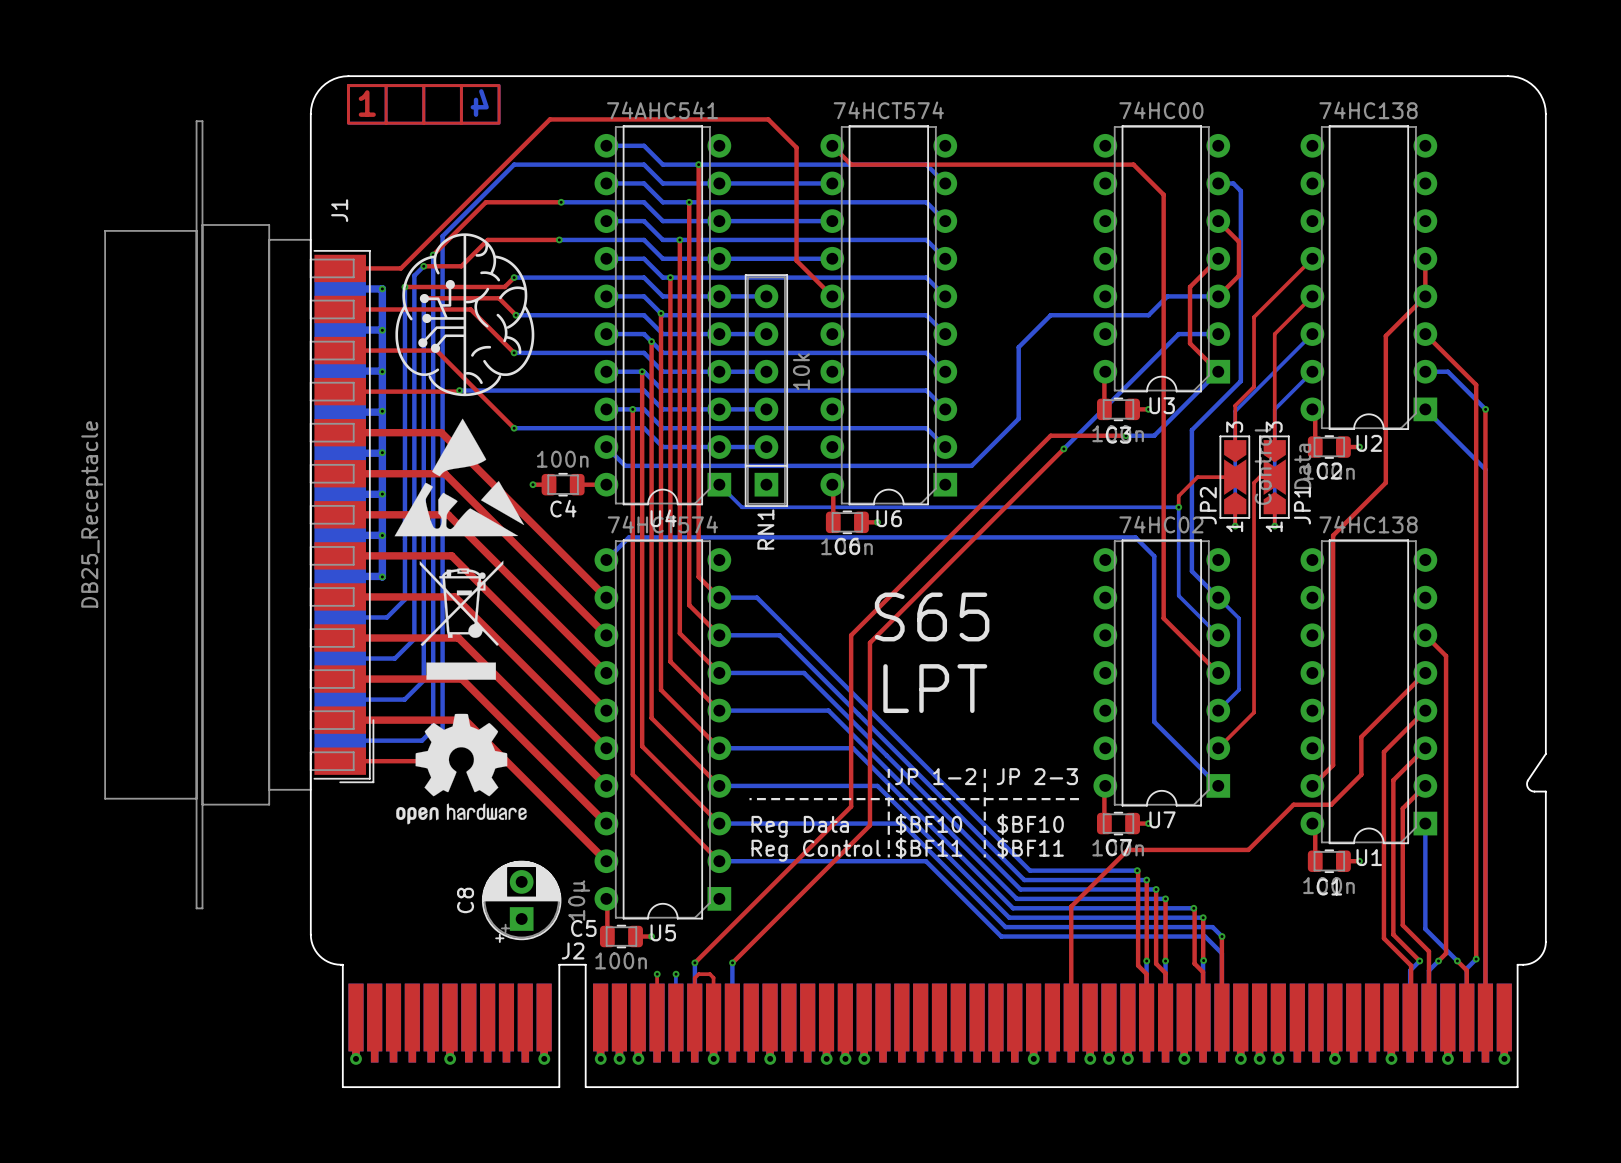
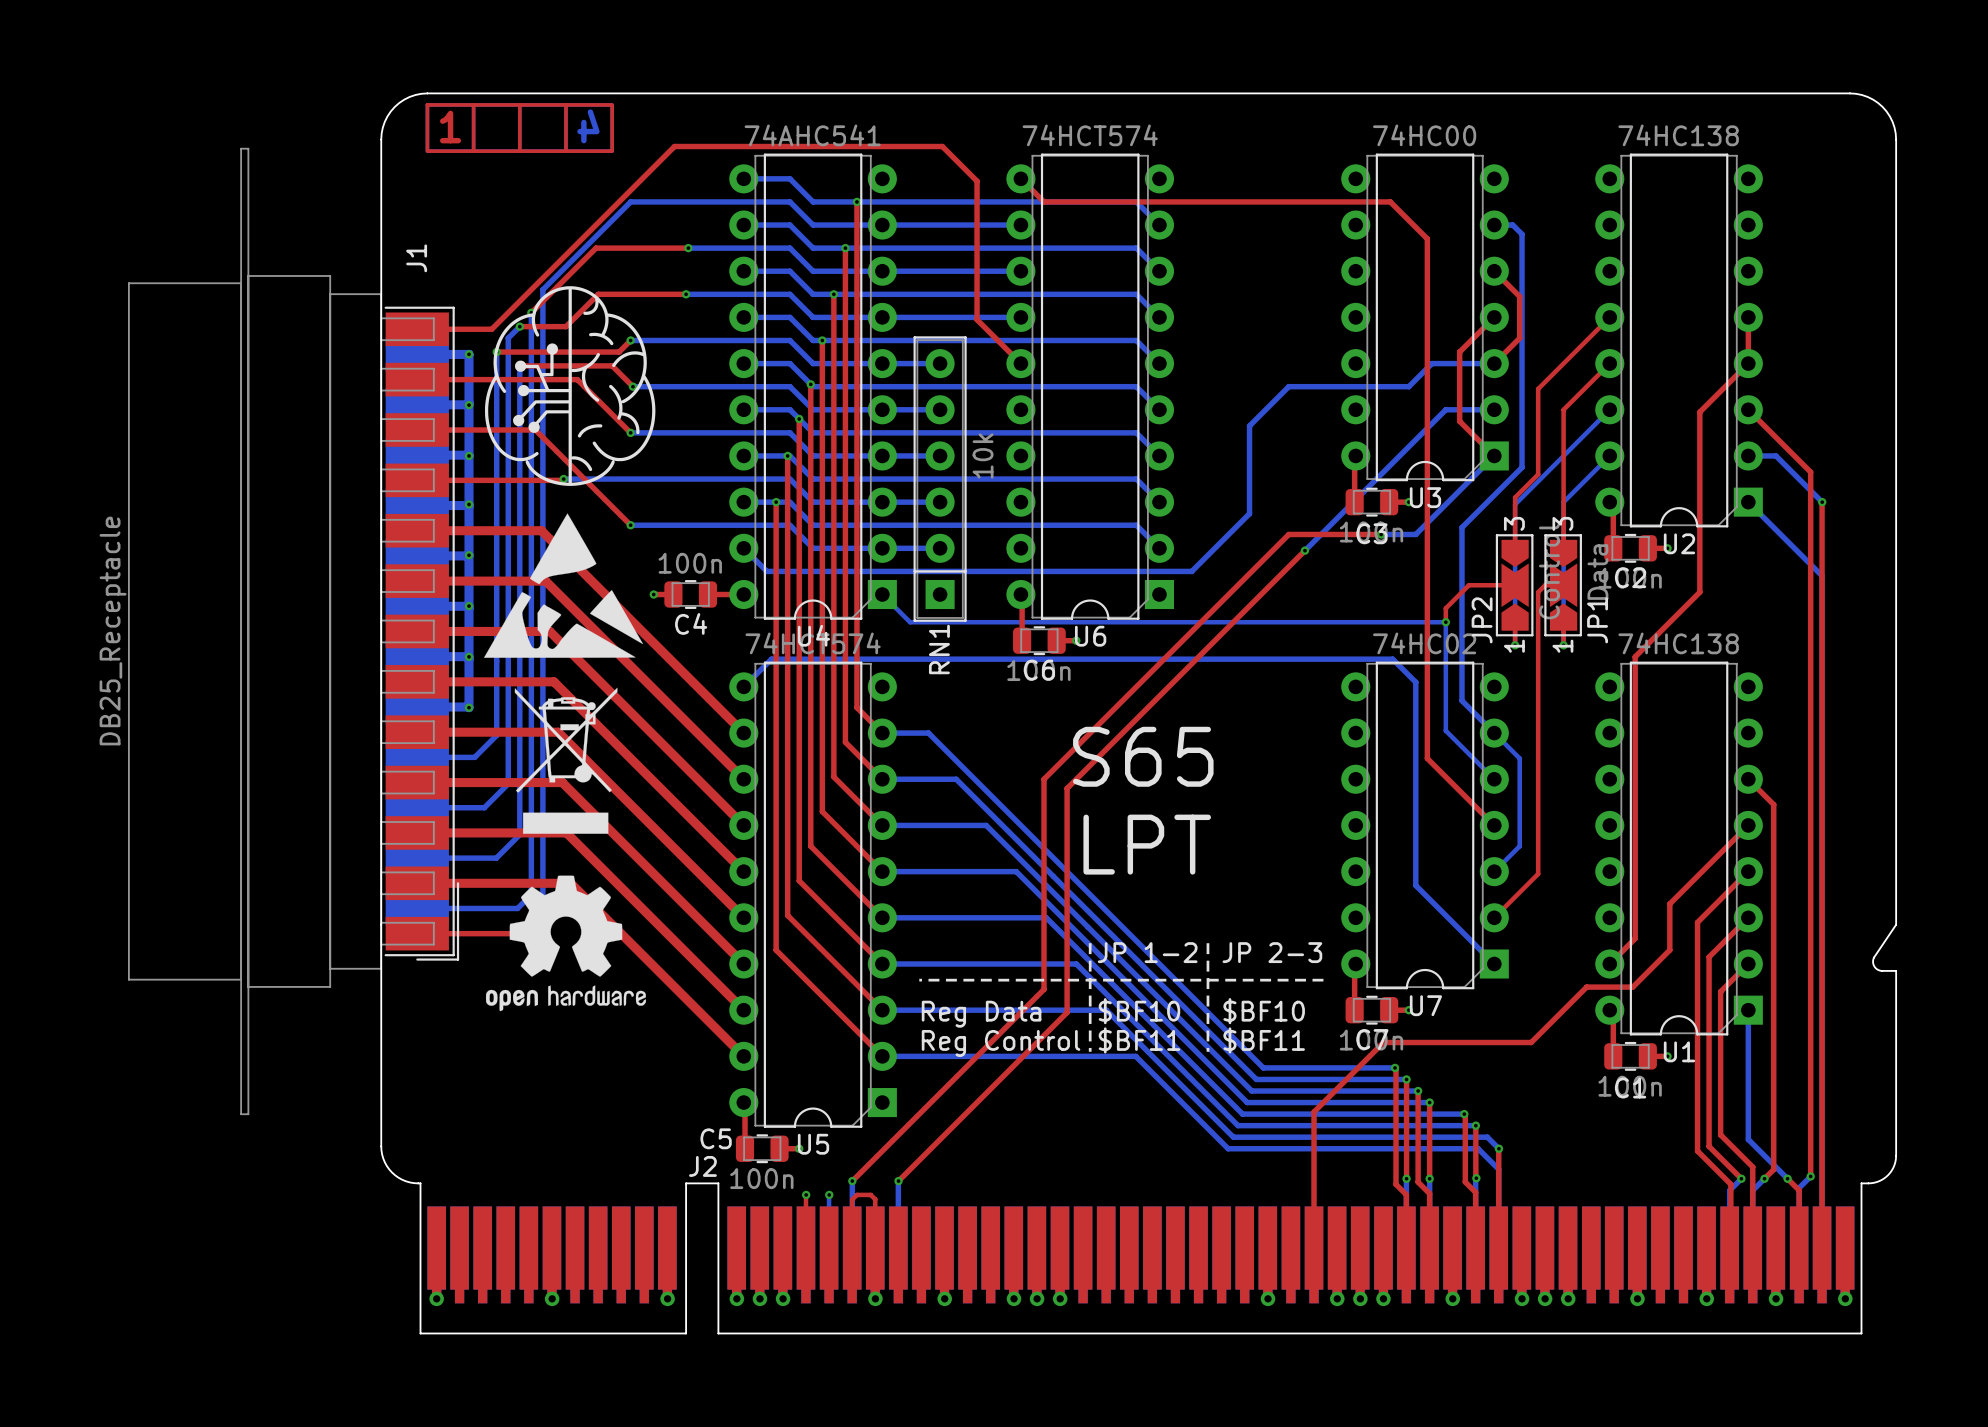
C8: 10µ (521, 901) -> none

